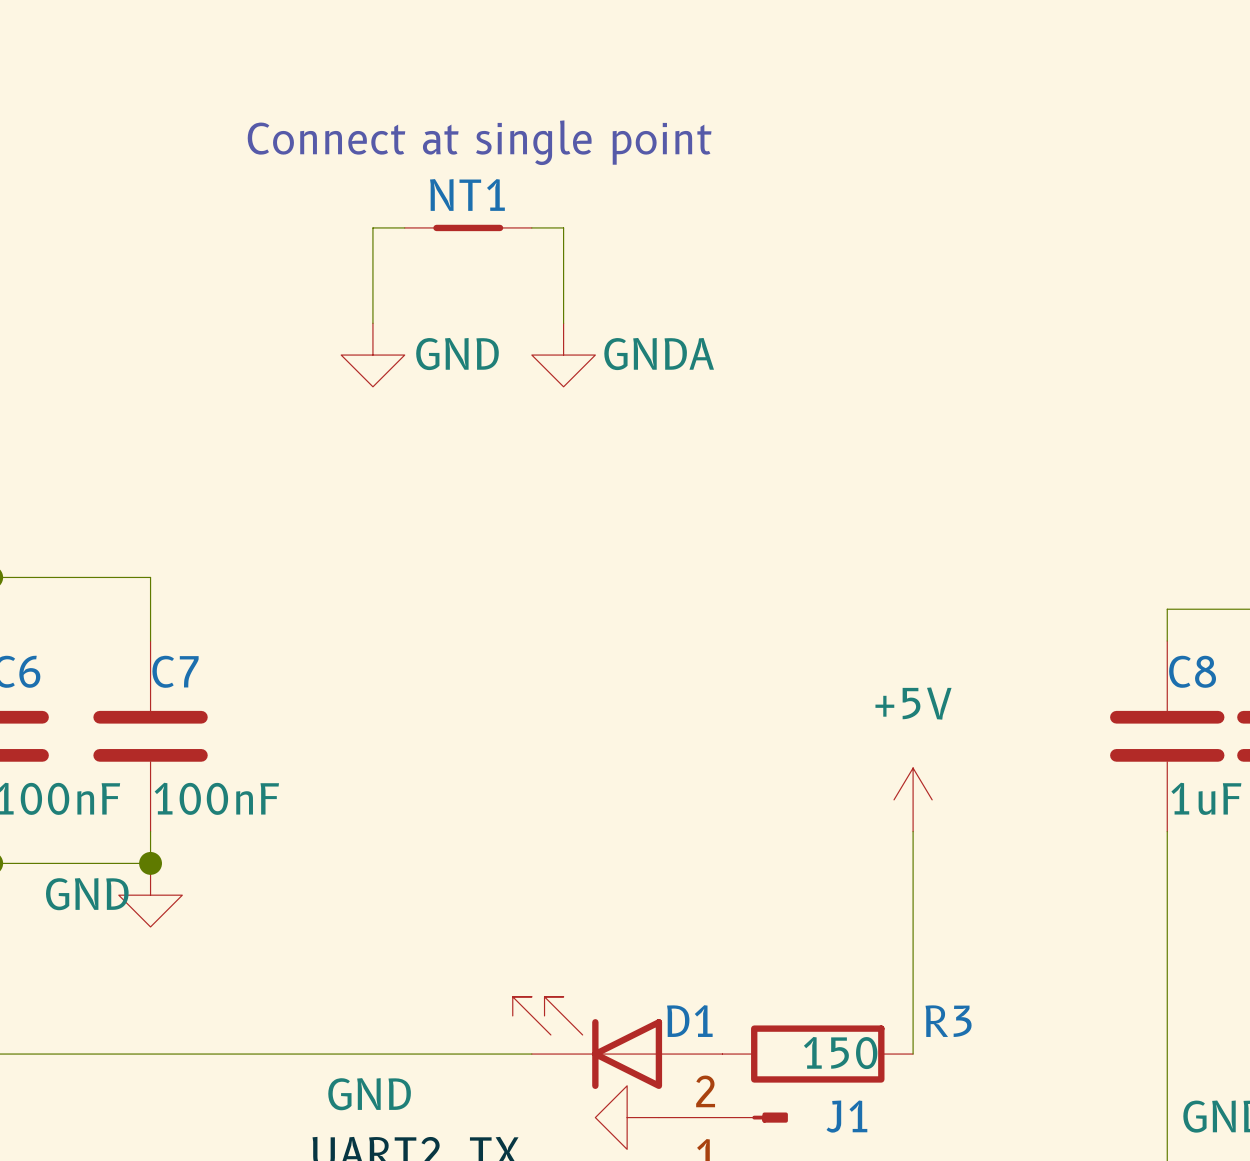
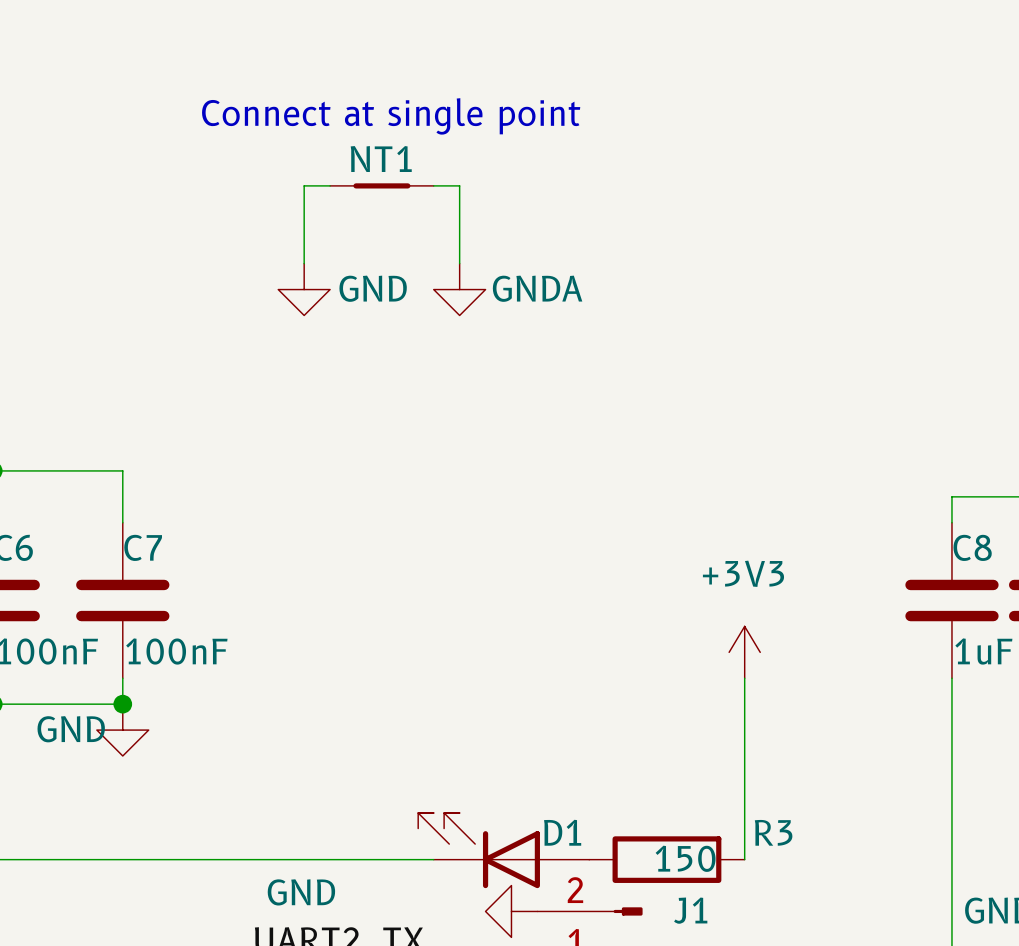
power symbol: +5V (913, 799) -> +3V3 (744, 652)

